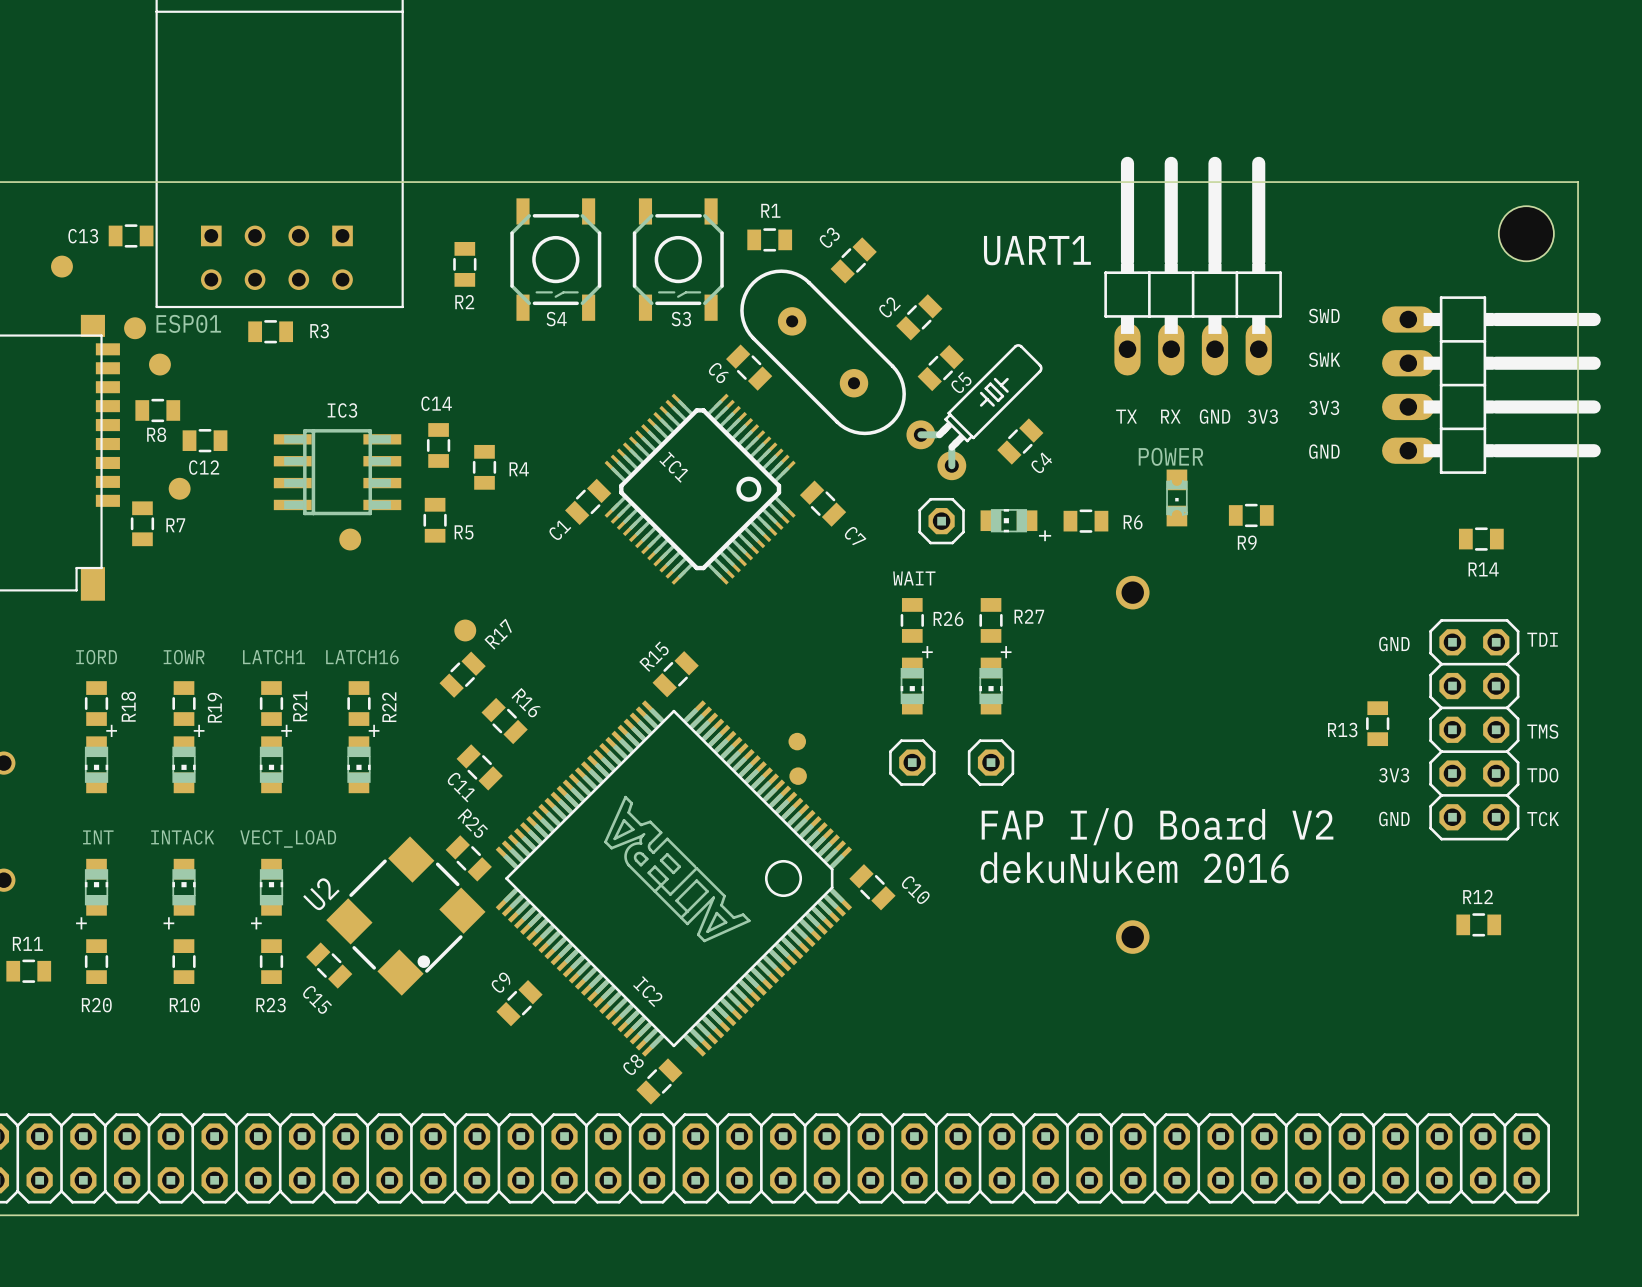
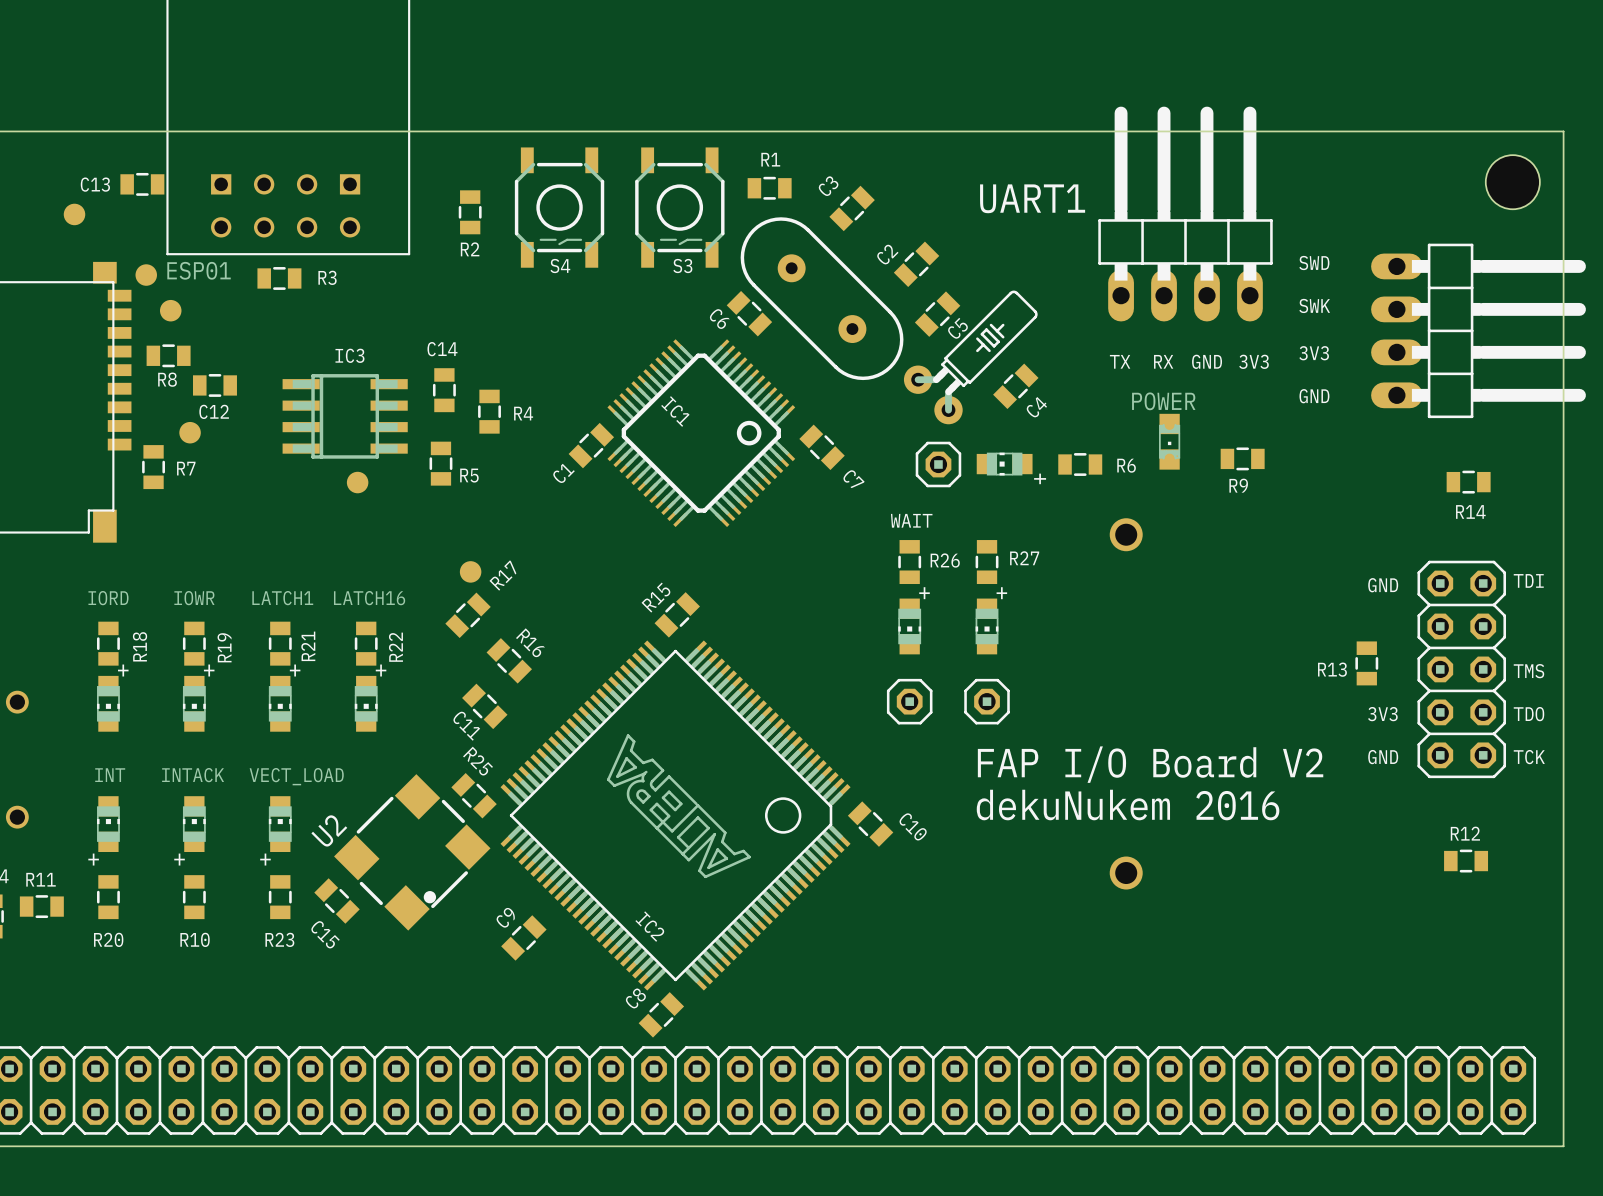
part: (797, 741) -> none
part: (798, 776) -> none

